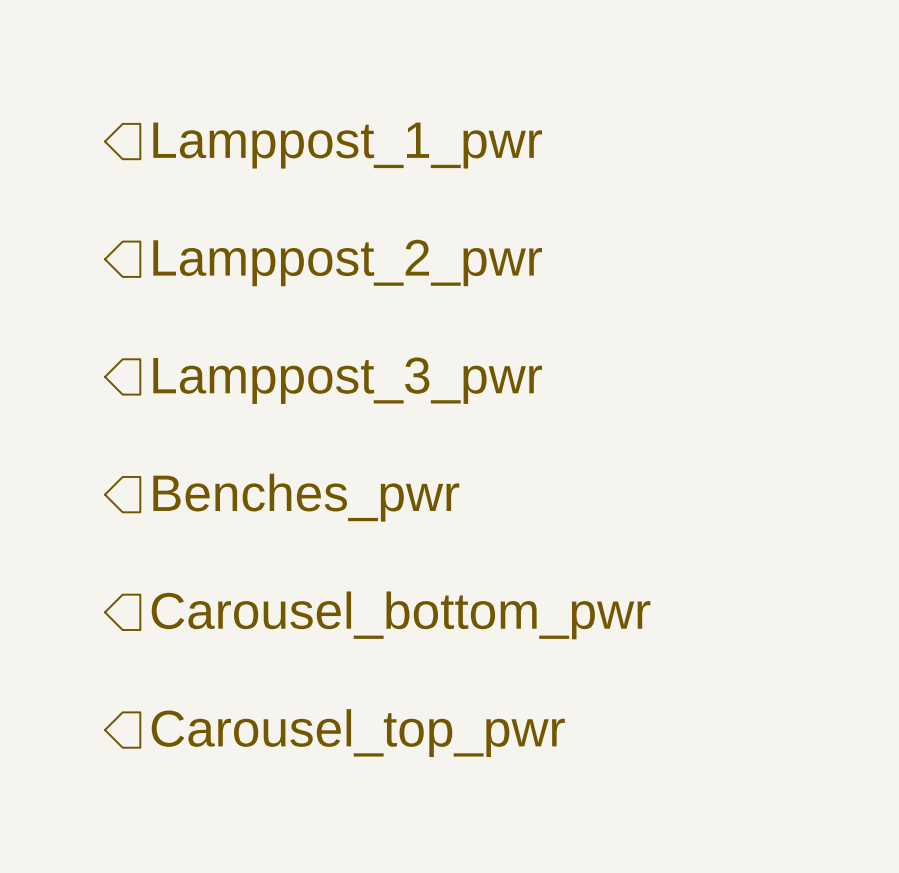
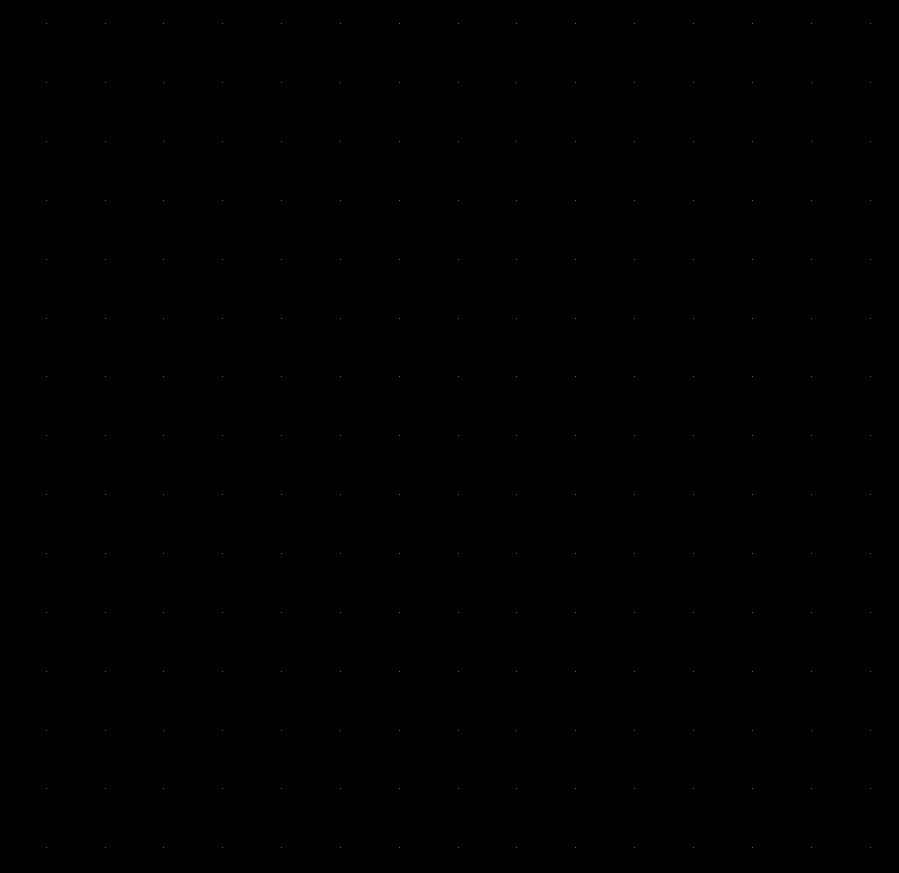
hierarchical label: Lamppost_1_pwr (347, 145) -> none
hierarchical label: Lamppost_2_pwr (347, 262) -> none
hierarchical label: Lamppost_3_pwr (347, 380) -> none
hierarchical label: Benches_pwr (306, 497) -> none
hierarchical label: Carousel_bottom_pwr (401, 615) -> none
hierarchical label: Carousel_top_pwr (358, 733) -> none

